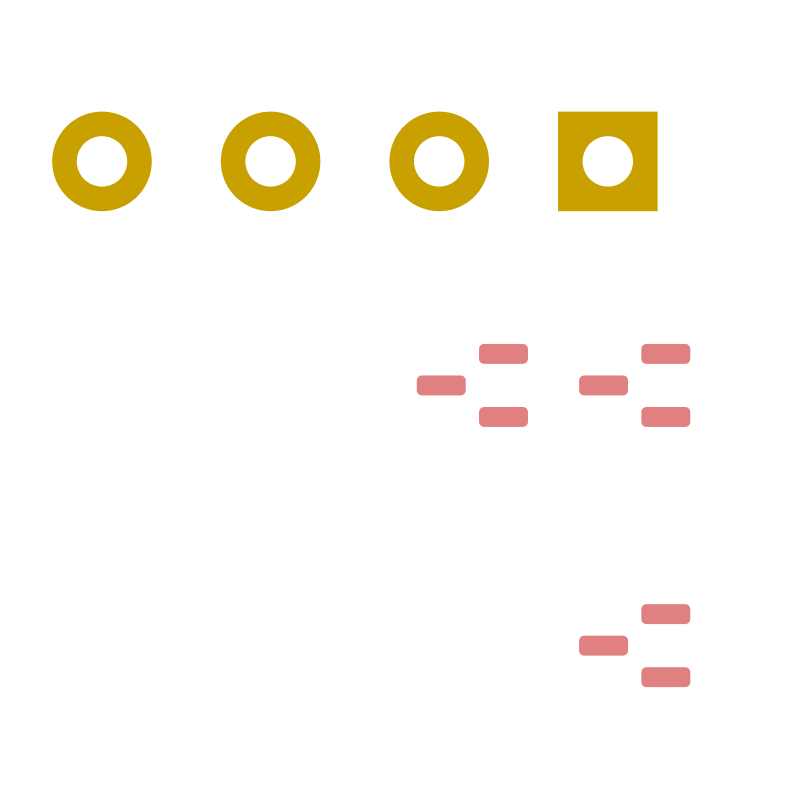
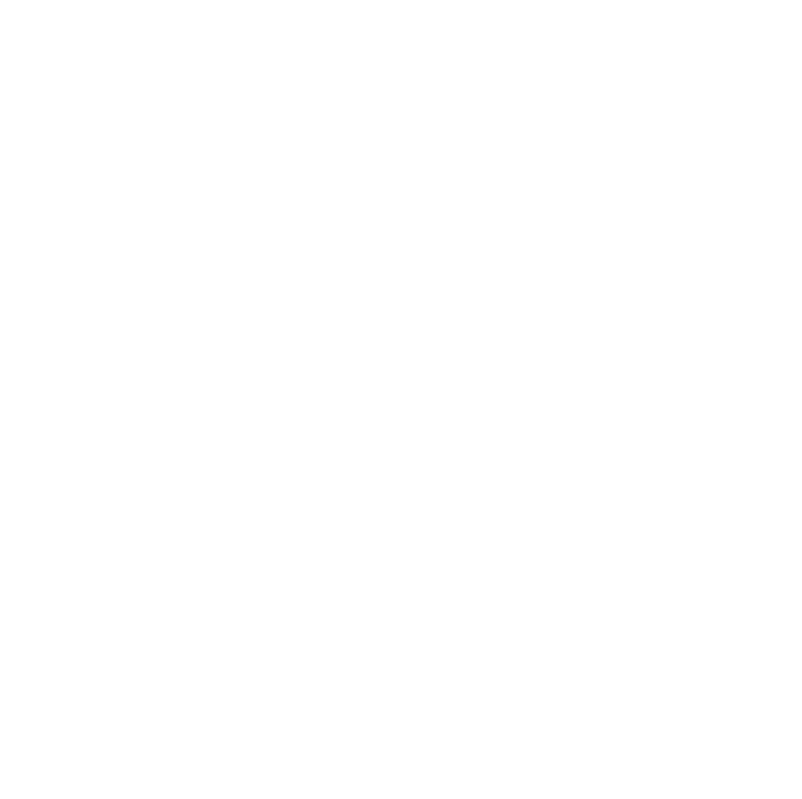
part: (354, 161) -> none
part: (472, 385) -> none
part: (634, 385) -> none
part: (634, 645) -> none

